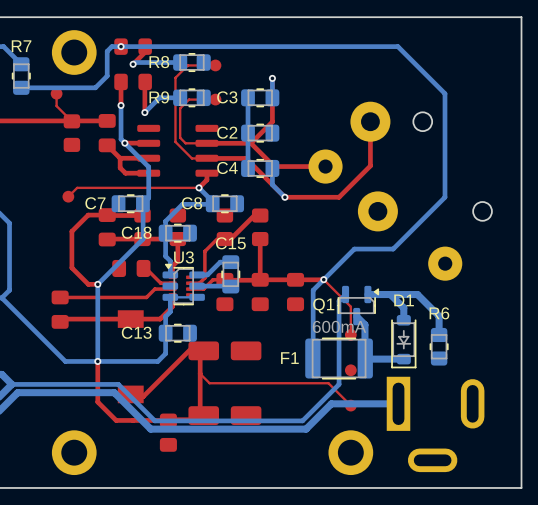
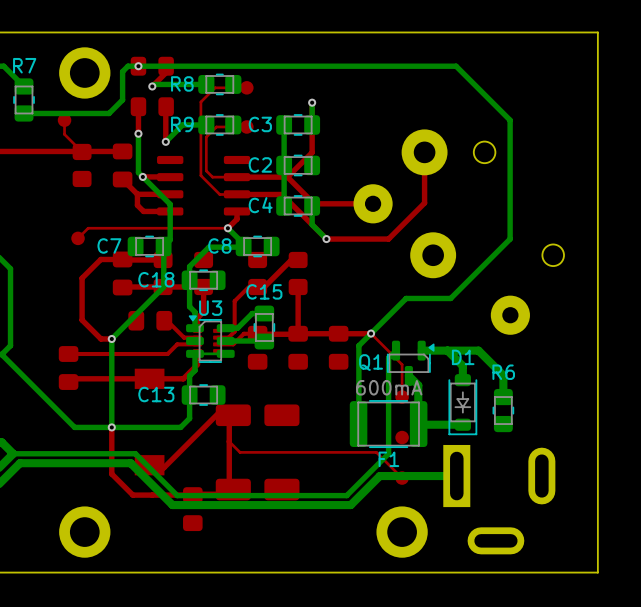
F1 name position: F1 (289, 358) -> F1 (388, 459)

